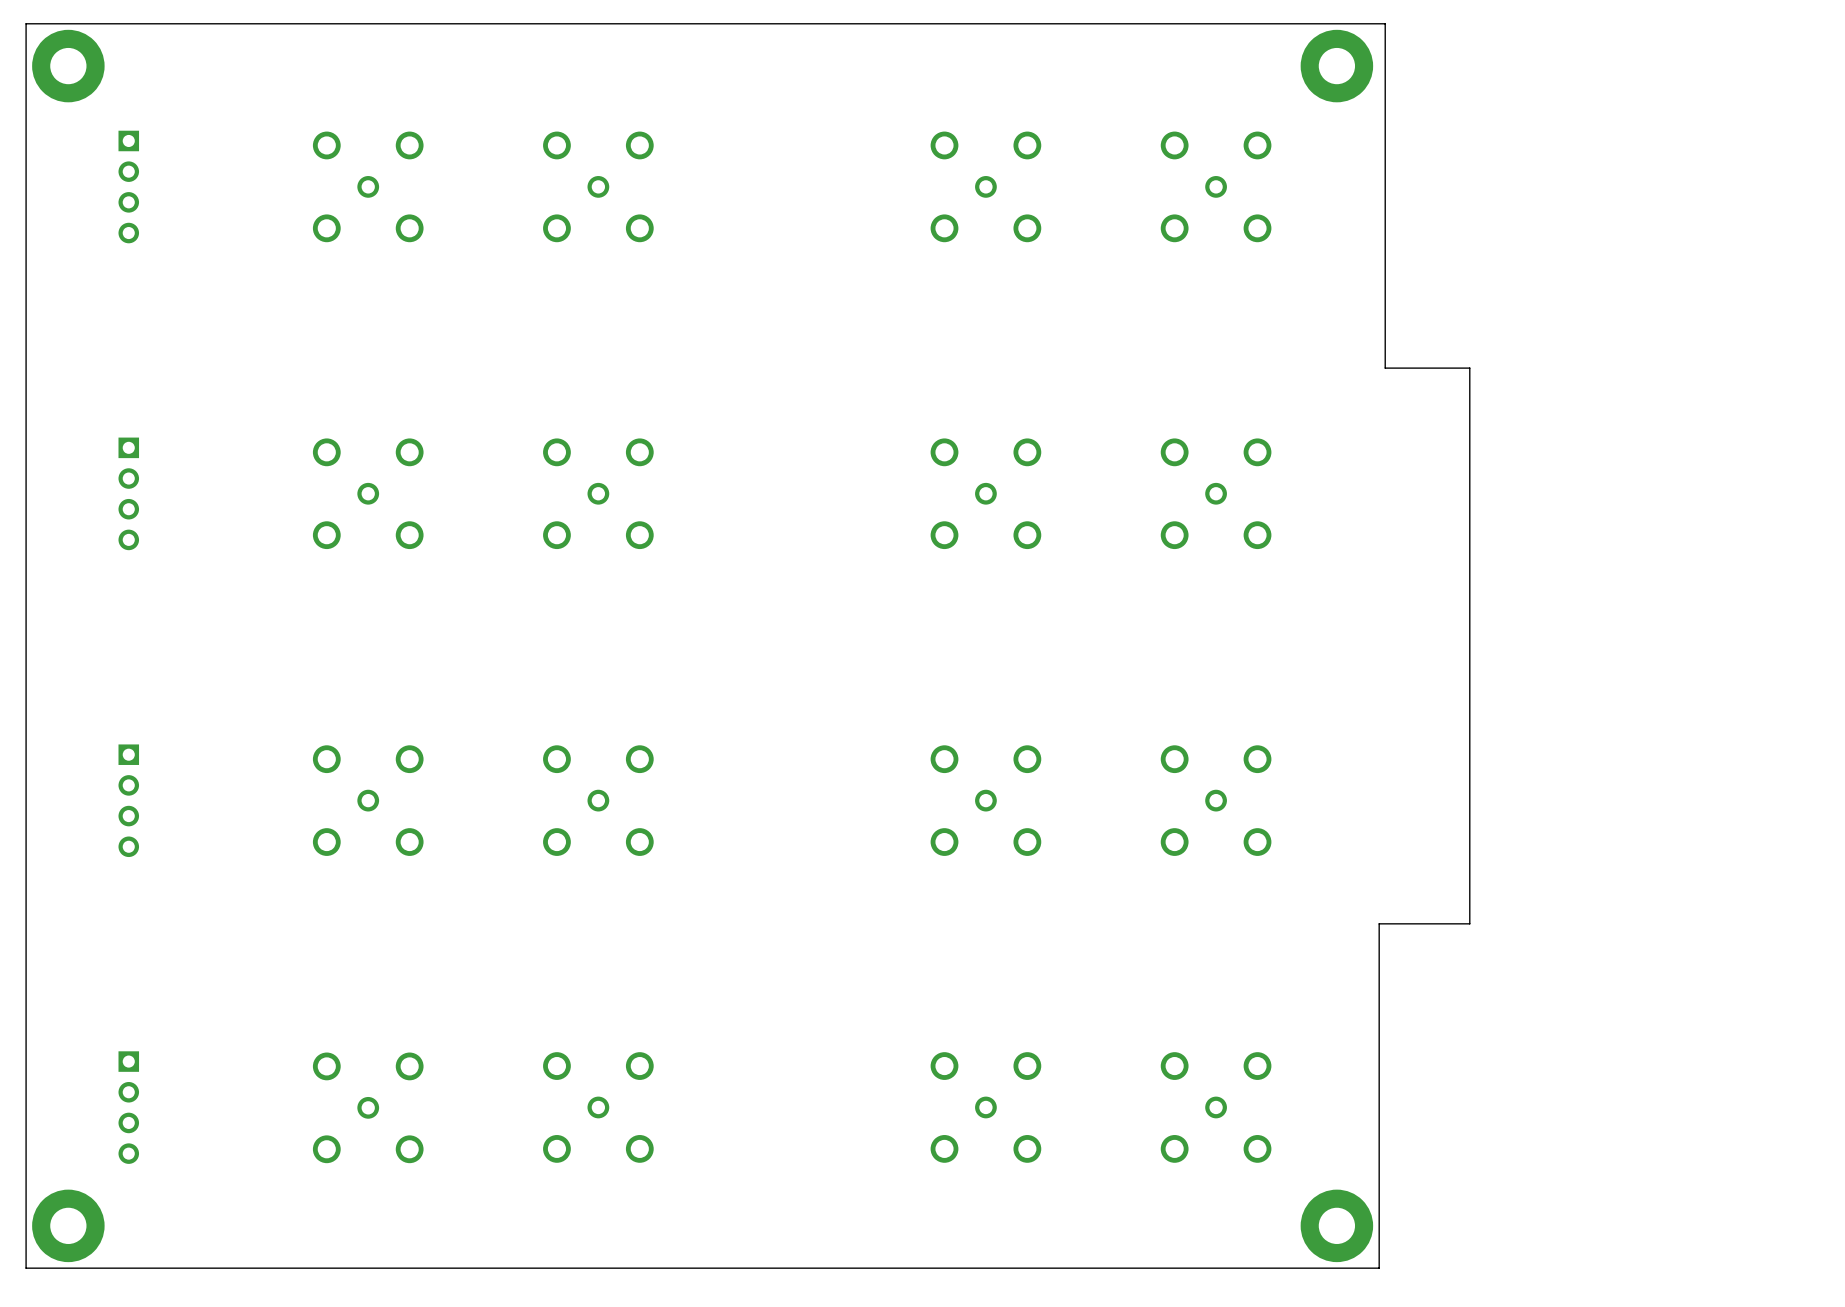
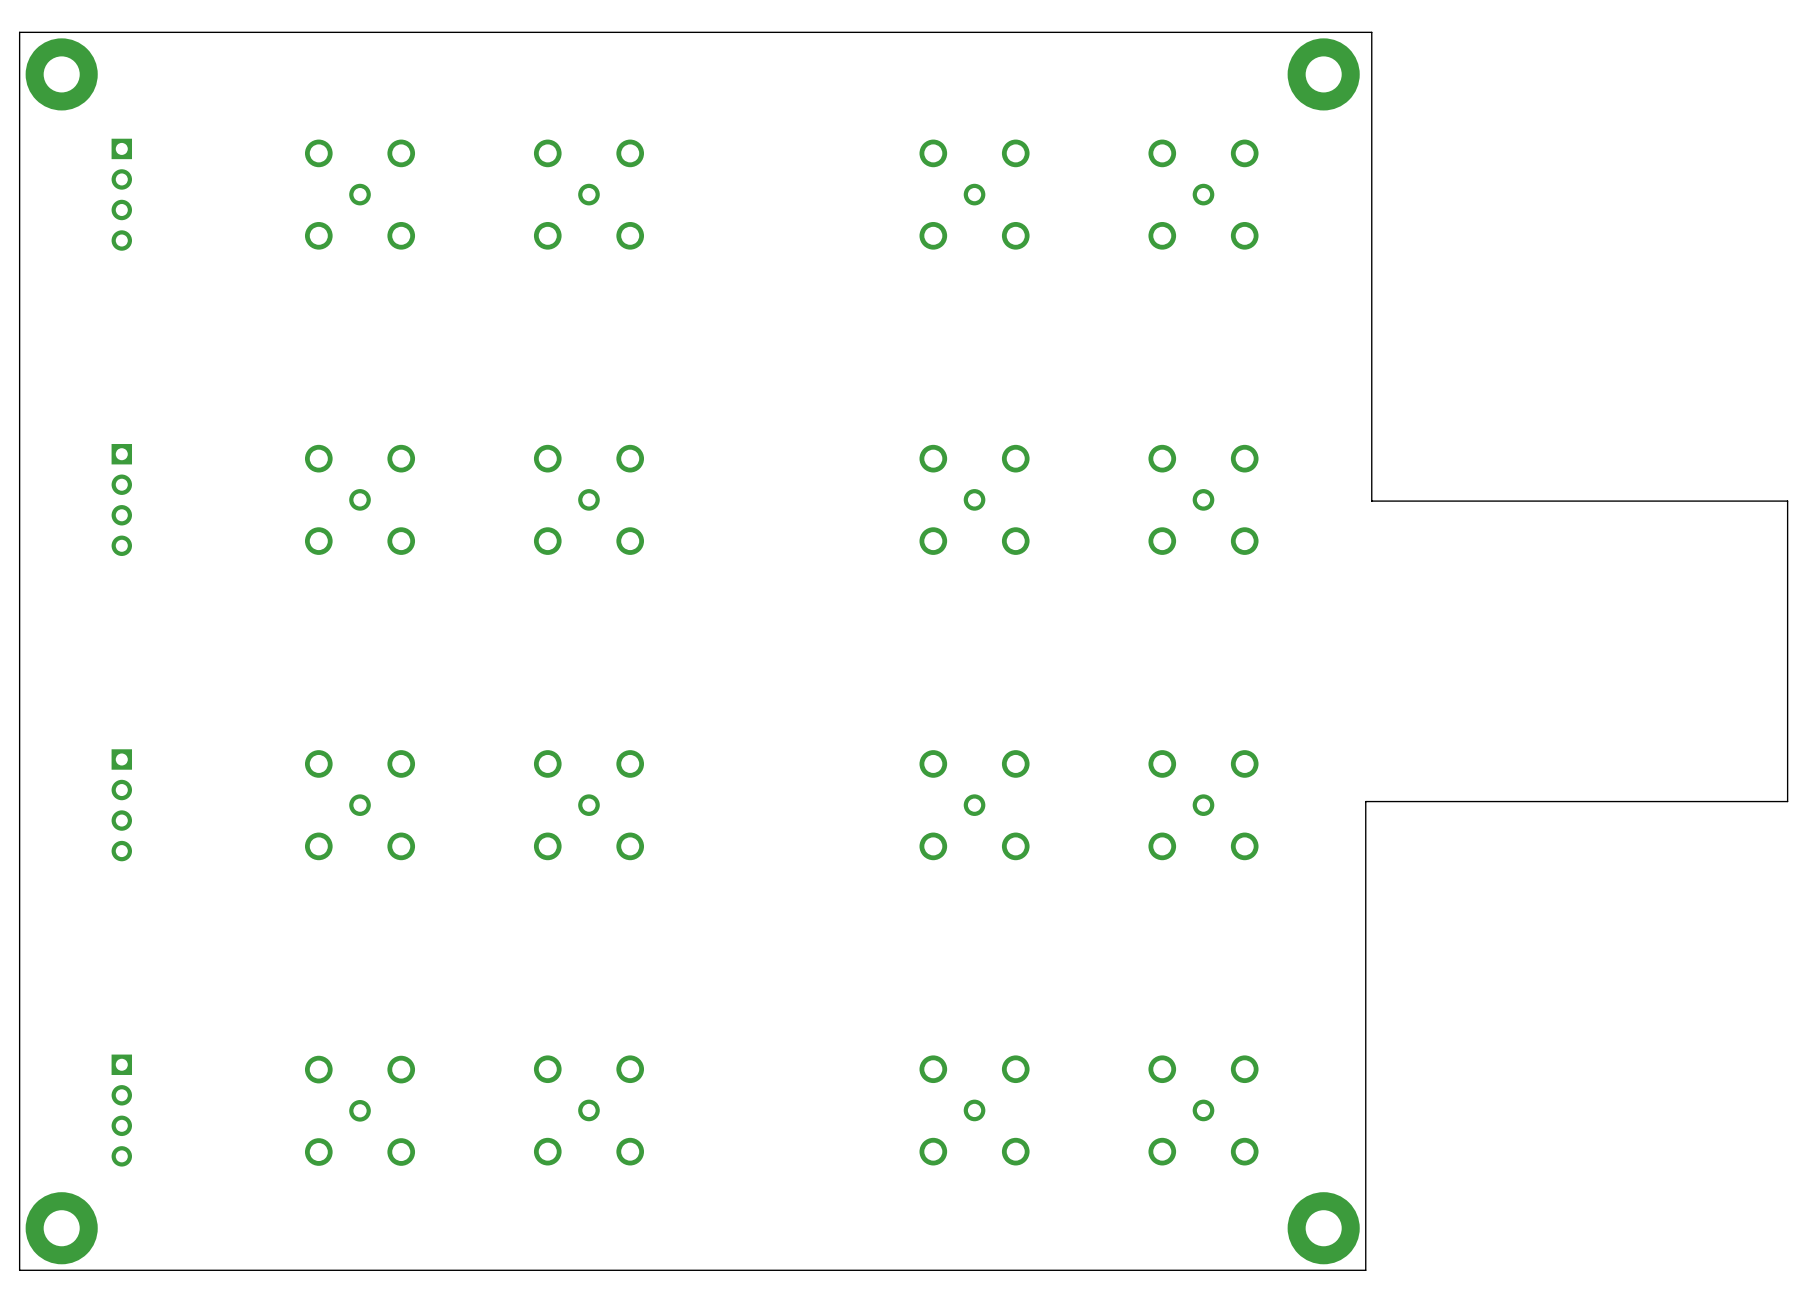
board edge: (1385, 368) (1469, 368) (1469, 923) (1379, 923) -> (1371, 374) (1371, 501) (1787, 501) (1787, 801) (1365, 801) (1365, 927)

